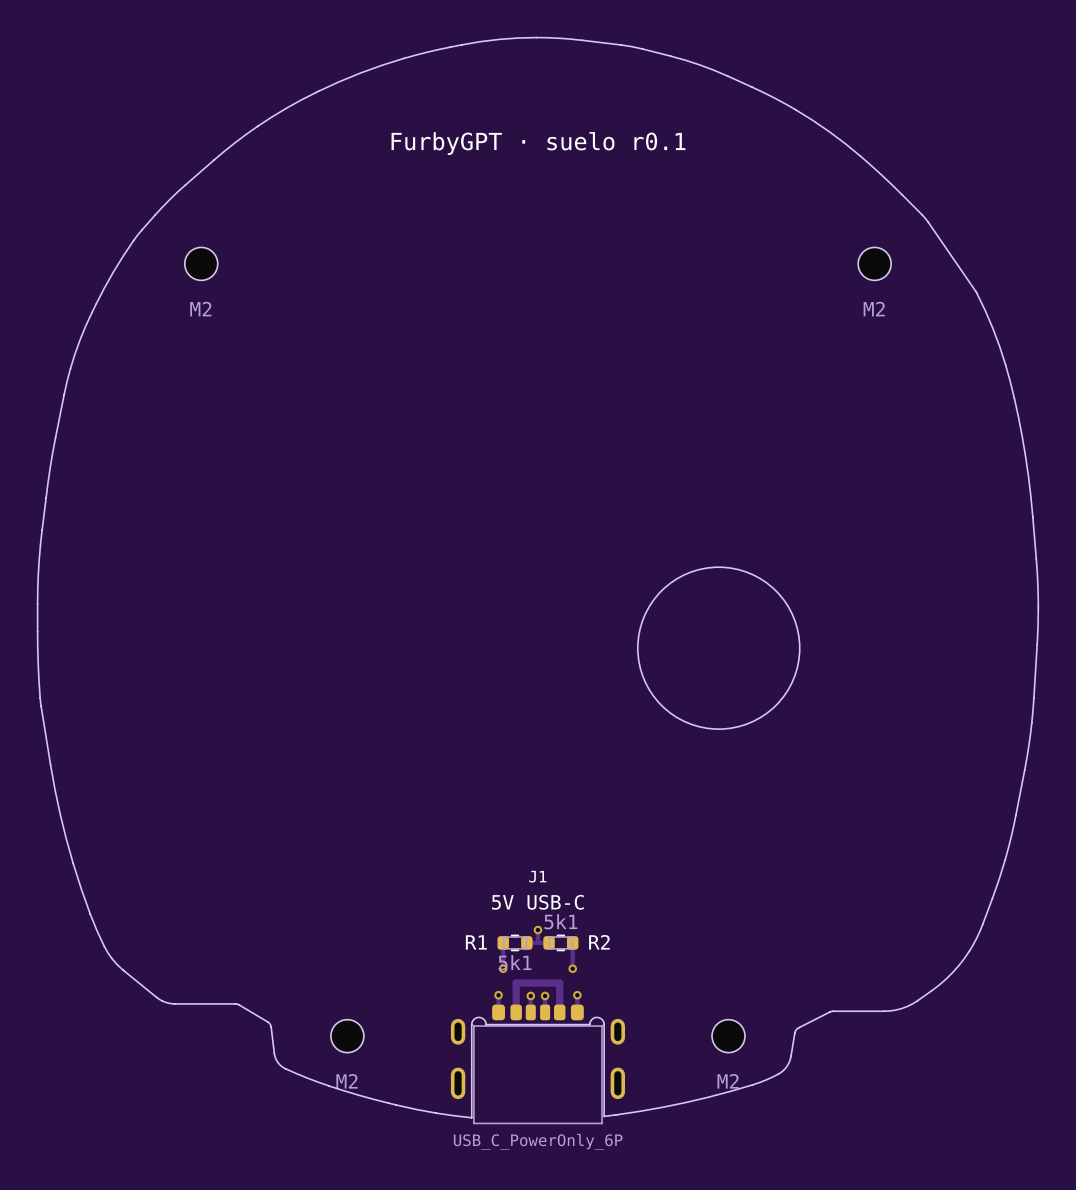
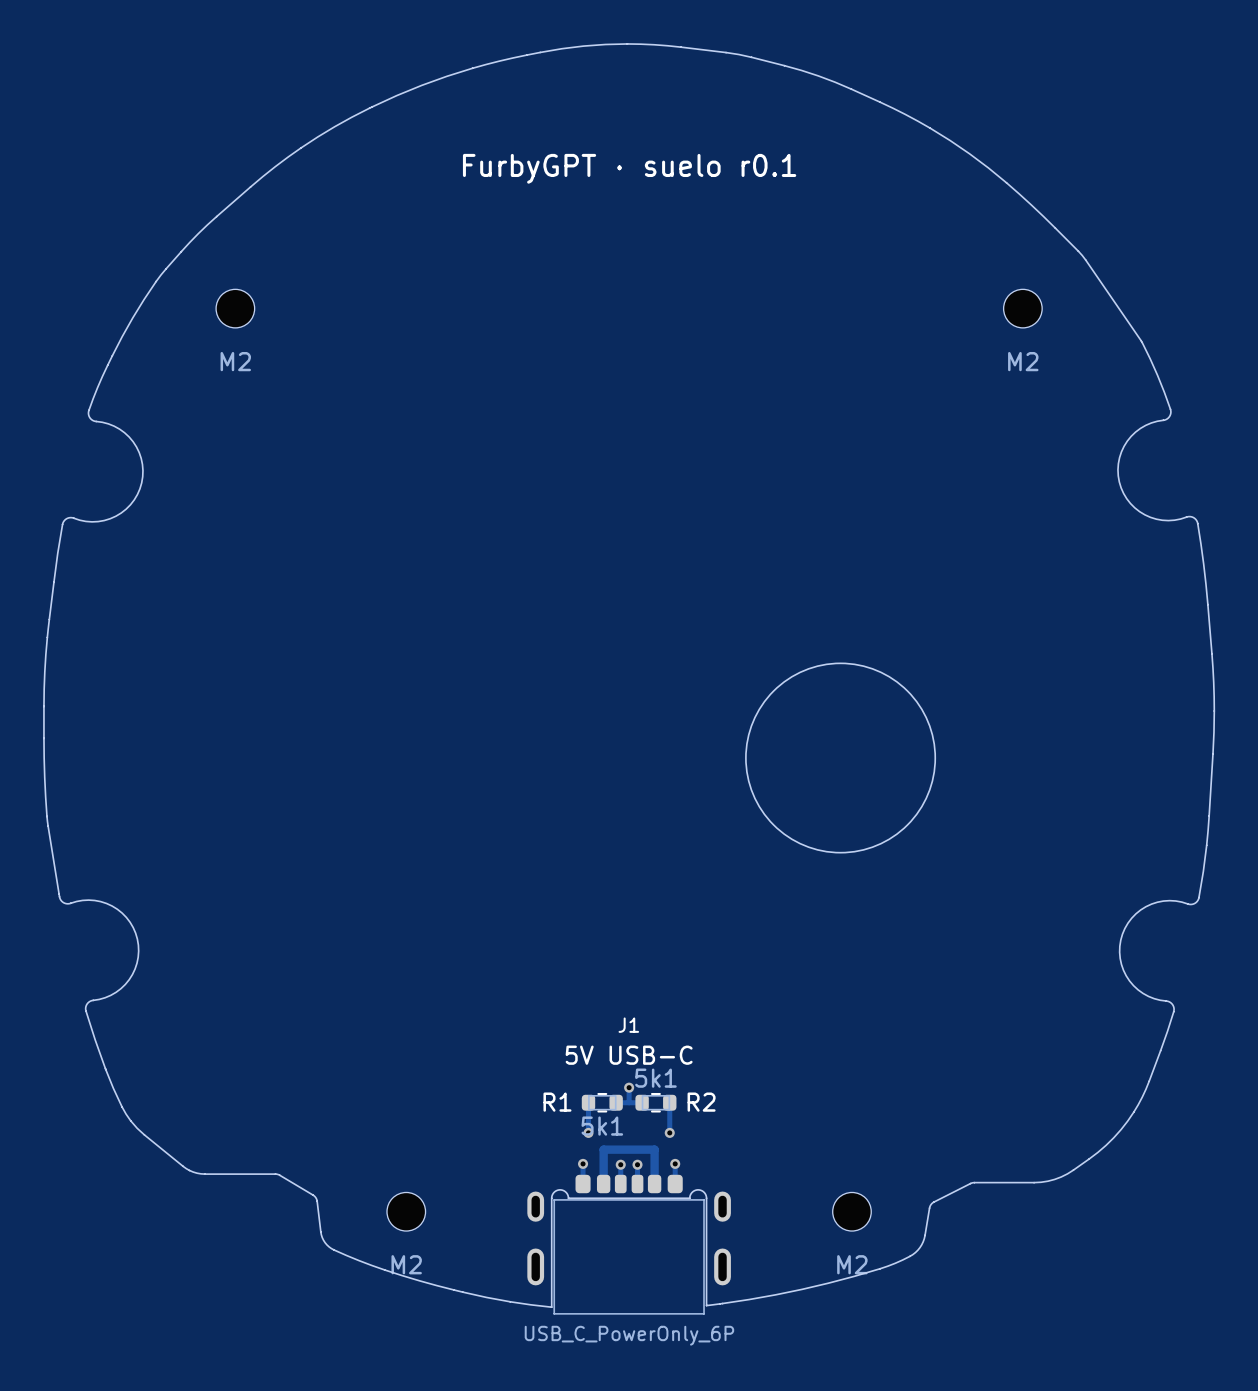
board edge: (976, 292) (992, 328) (1010, 381) (1025, 457) (1032, 516) -> (1142, 342) (1157, 375) (1170, 413) (1166, 419) (1151, 422) (1140, 428) (1127, 441) (1118, 463) (1119, 481) (1130, 503) (1144, 514) (1162, 520) (1174, 520) (1189, 516) (1196, 519) (1200, 543) (1207, 604)
board edge: (92, 312) (80, 339) (67, 381) (52, 452) (46, 497) -> (107, 365) (93, 398) (88, 415) (93, 420) (108, 423) (119, 429) (133, 441) (141, 458) (142, 470) (141, 482) (134, 499) (126, 509) (115, 516) (98, 521) (85, 521) (70, 517) (64, 520) (53, 582)
board edge: (1031, 722) (1013, 826) (992, 898) -> (1206, 845) (1197, 901) (1190, 904) (1175, 901) (1163, 901) (1146, 906) (1131, 918) (1124, 928) (1120, 940) (1119, 952) (1121, 964) (1129, 980) (1143, 993) (1154, 998) (1169, 1001) (1173, 1006) (1173, 1011) (1160, 1050)
board edge: (50, 764) (66, 839) (90, 913) -> (59, 894) (60, 899) (65, 903) (88, 900) (112, 906) (126, 917) (137, 939) (138, 957) (129, 979) (116, 992) (105, 997) (90, 1001) (85, 1006) (105, 1068)

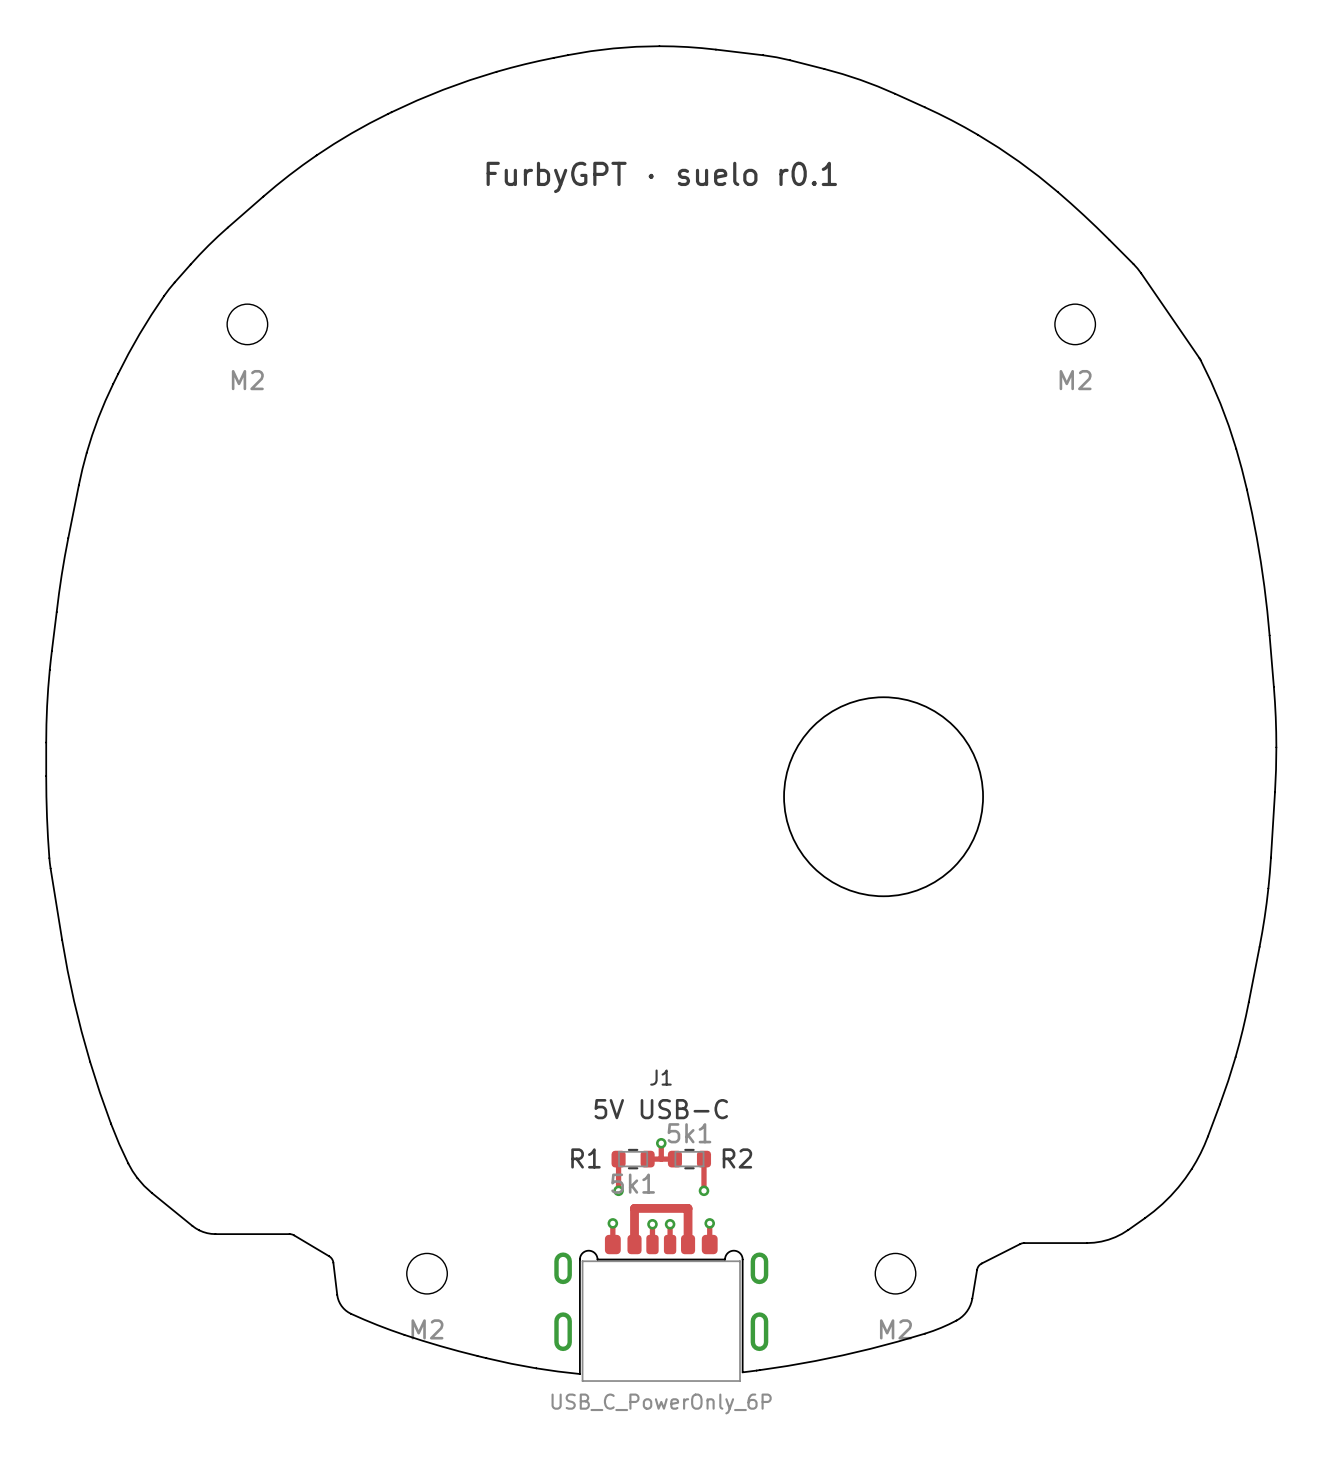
board edge: (1142, 342) (1157, 375) (1170, 413) (1166, 419) (1151, 422) (1140, 428) (1127, 441) (1118, 463) (1119, 481) (1130, 503) (1144, 514) (1162, 520) (1174, 520) (1189, 516) (1196, 519) (1200, 543) (1207, 604) -> (1200, 359) (1220, 403) (1241, 469) (1260, 562) (1269, 635)
board edge: (107, 365) (93, 398) (88, 415) (93, 420) (108, 423) (119, 429) (133, 441) (141, 458) (142, 470) (141, 482) (134, 499) (126, 509) (115, 516) (98, 521) (85, 521) (70, 517) (64, 520) (53, 582) -> (113, 384) (98, 417) (82, 469) (64, 556) (56, 612)
board edge: (1206, 845) (1197, 901) (1190, 904) (1175, 901) (1163, 901) (1146, 906) (1131, 918) (1124, 928) (1120, 940) (1119, 952) (1121, 964) (1129, 980) (1143, 993) (1154, 998) (1169, 1001) (1173, 1006) (1173, 1011) (1160, 1050) -> (1268, 888) (1262, 932) (1245, 1016) (1235, 1057) (1219, 1104)
board edge: (59, 894) (60, 899) (65, 903) (88, 900) (112, 906) (126, 917) (137, 939) (138, 957) (129, 979) (116, 992) (105, 997) (90, 1001) (85, 1006) (105, 1068) -> (62, 939) (81, 1031) (110, 1123)

